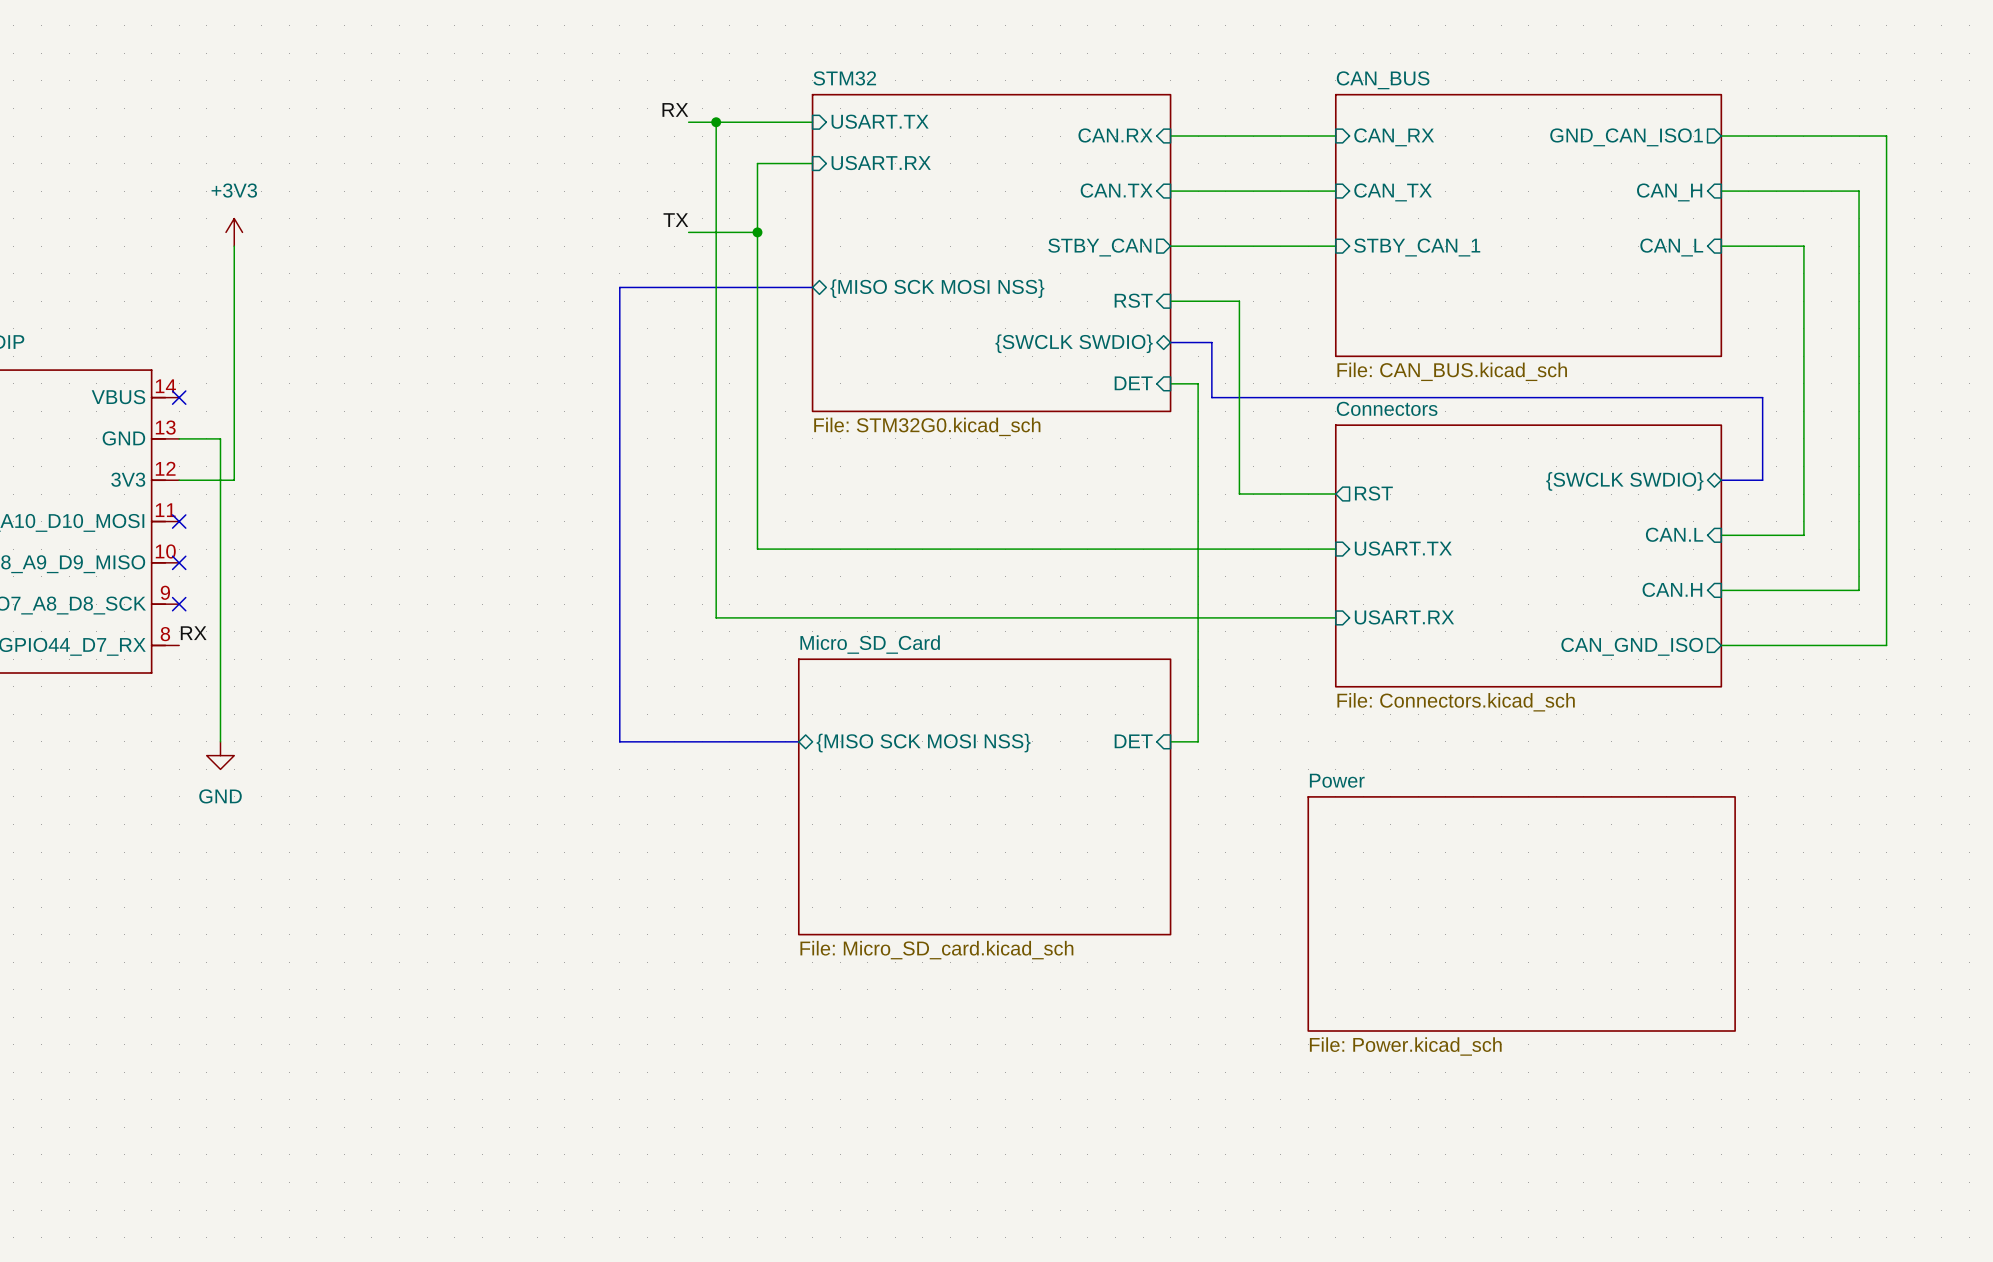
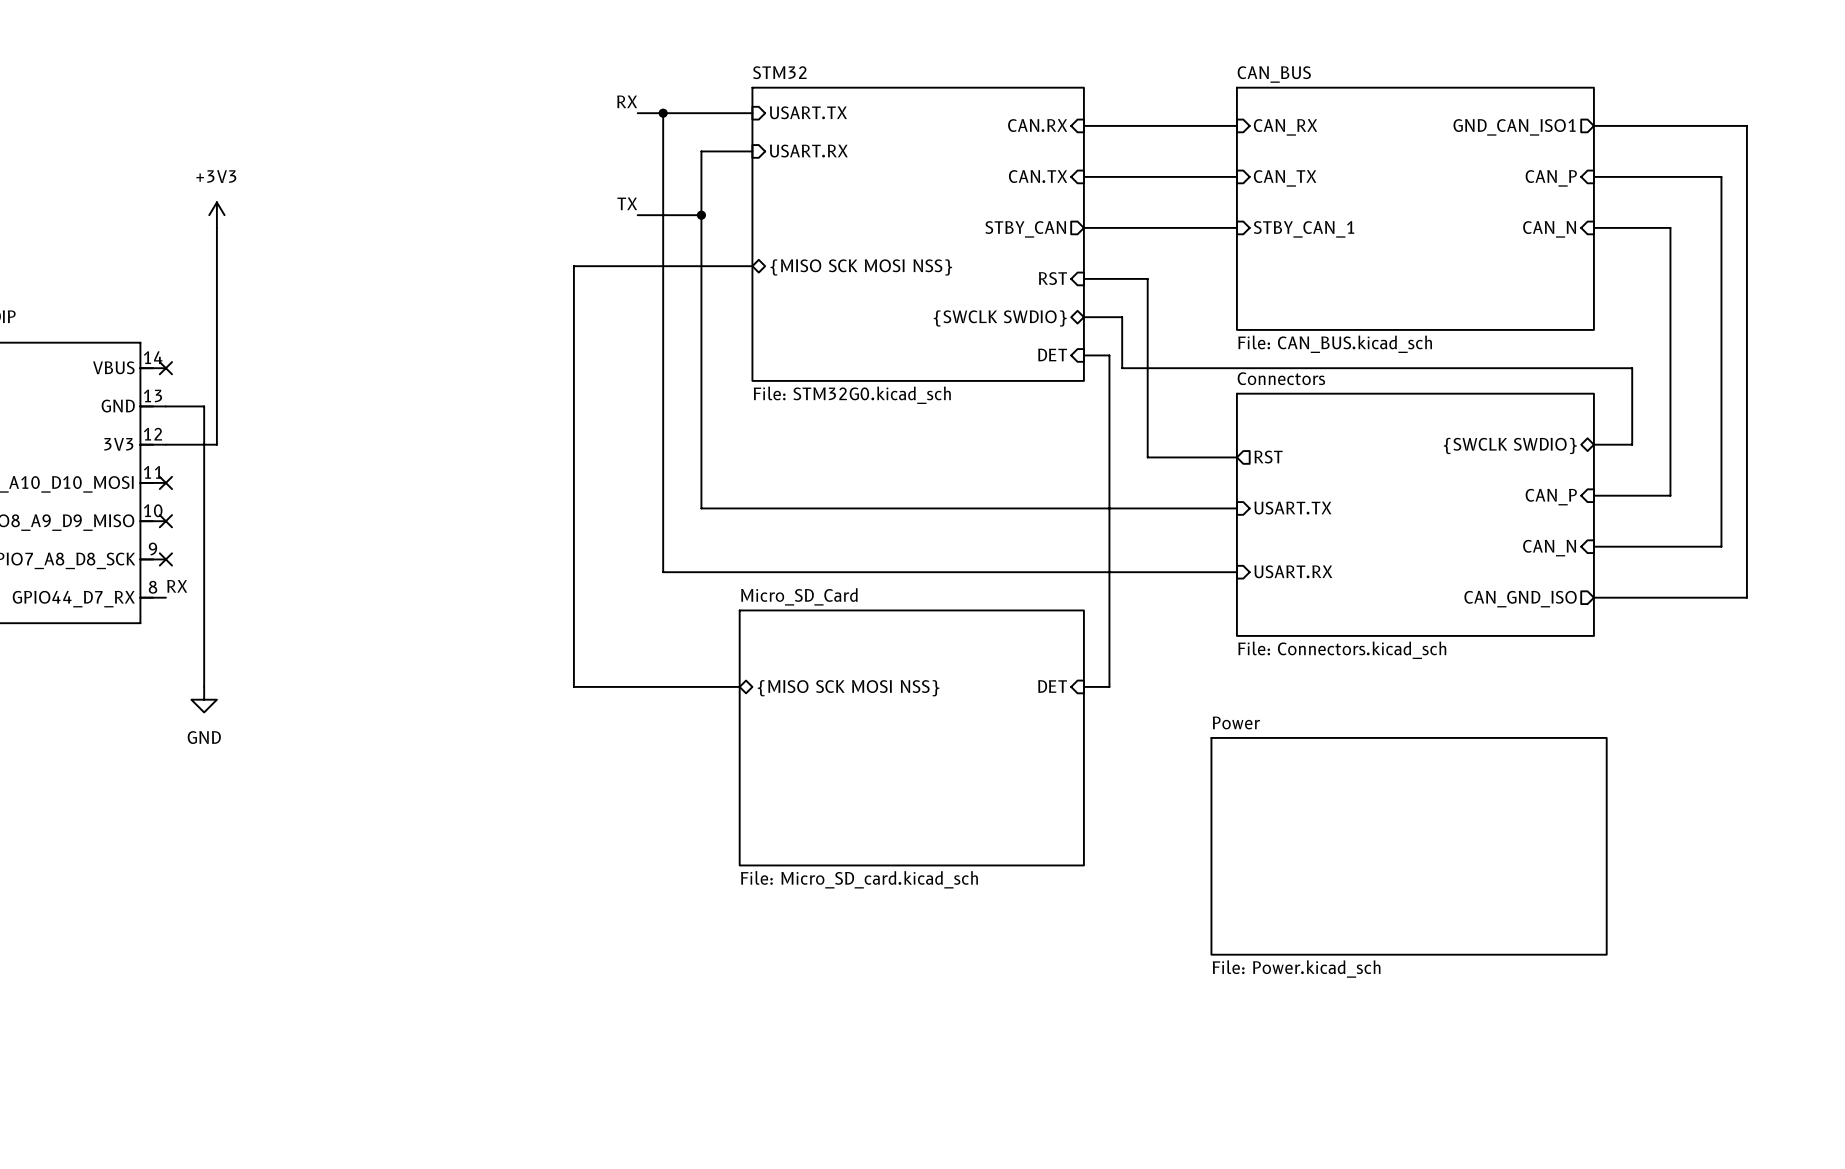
sheet pin: CAN_H (1669, 192) -> CAN_P (1551, 178)
sheet pin: CAN_L (1671, 247) -> CAN_N (1549, 229)
sheet pin: CAN.L (1674, 534) -> CAN_P (1551, 497)
sheet pin: CAN.H (1672, 589) -> CAN_N (1549, 548)

